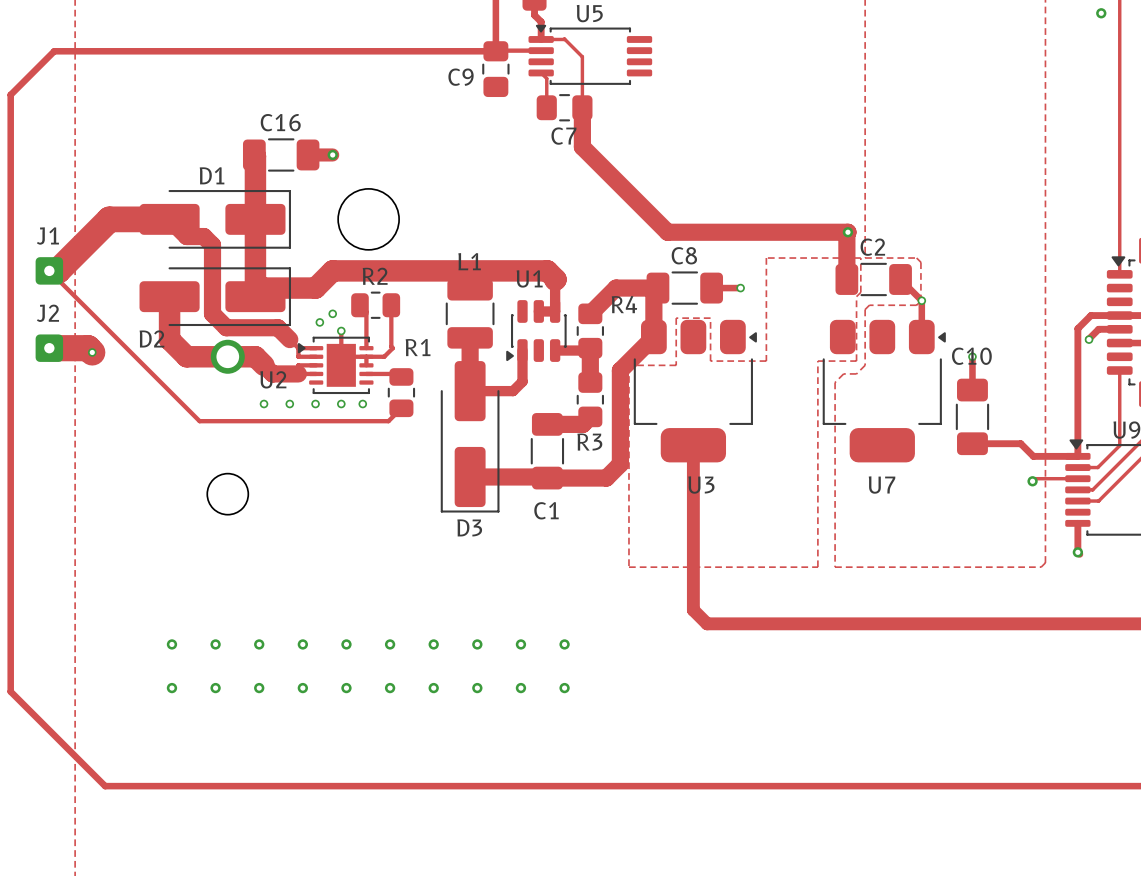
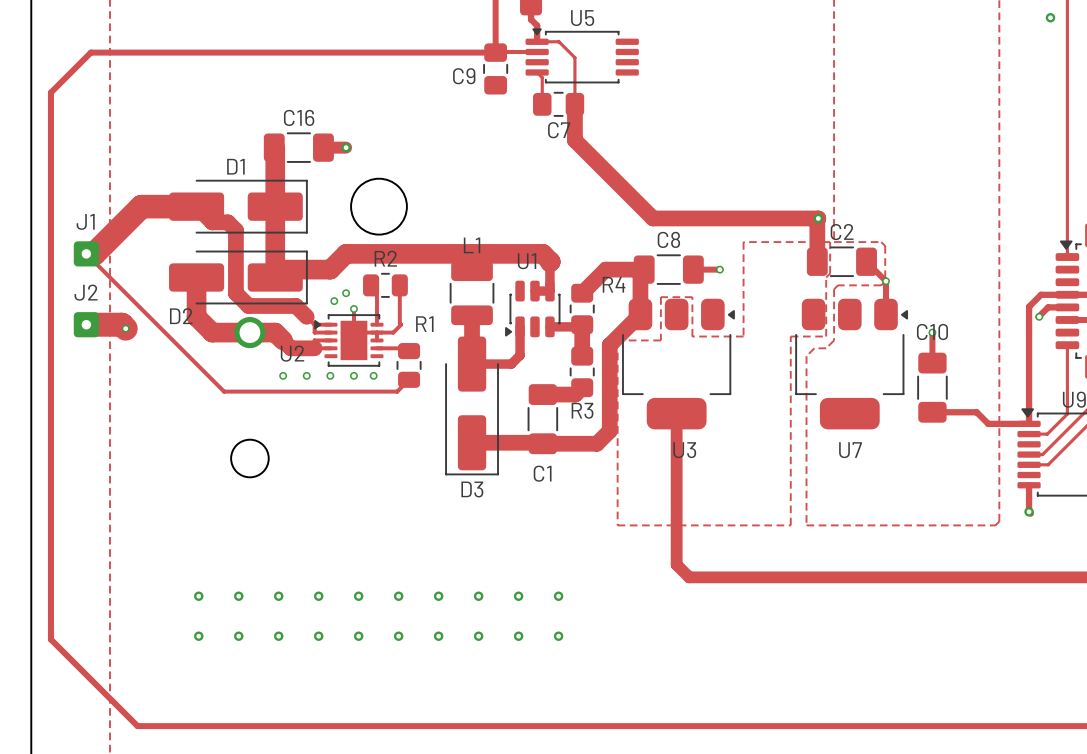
track: (1077, 478) (1035, 478) (1032, 481) -> none
via: (1032, 481) -> none

